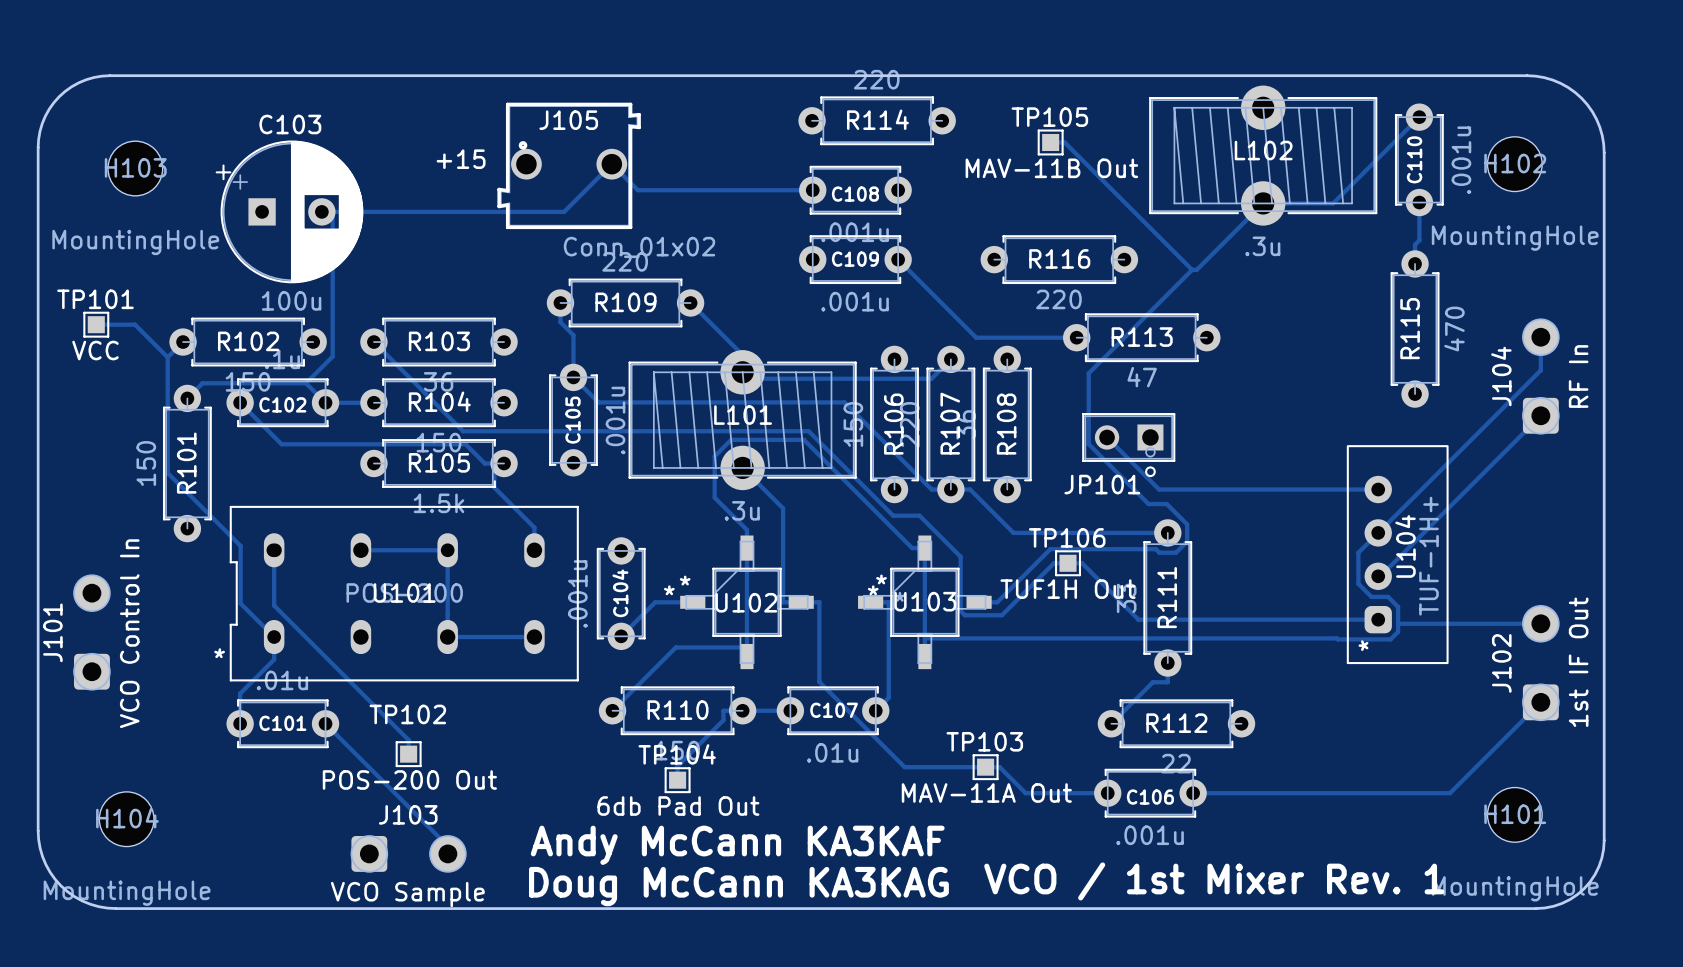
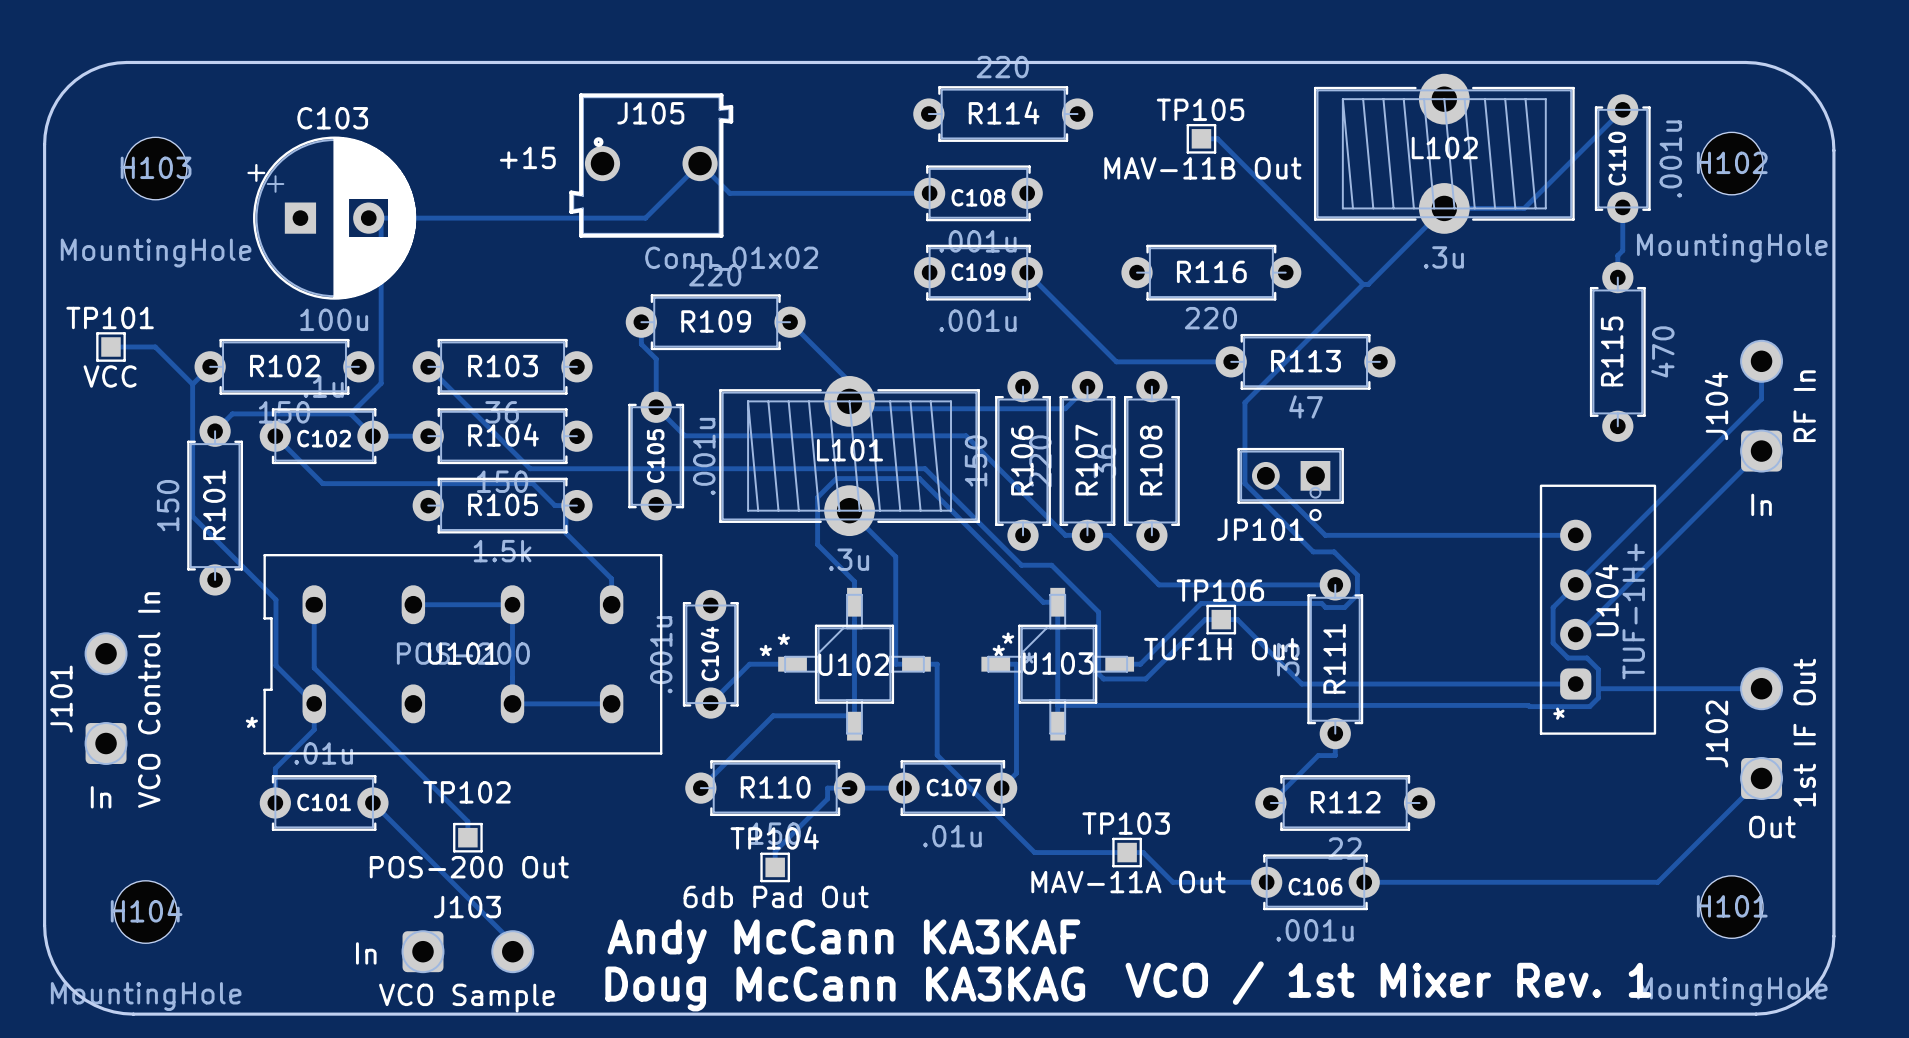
text: none -> In (1761, 504)
text: none -> In (101, 797)
text: none -> Out (1772, 827)
text: none -> In (366, 953)

